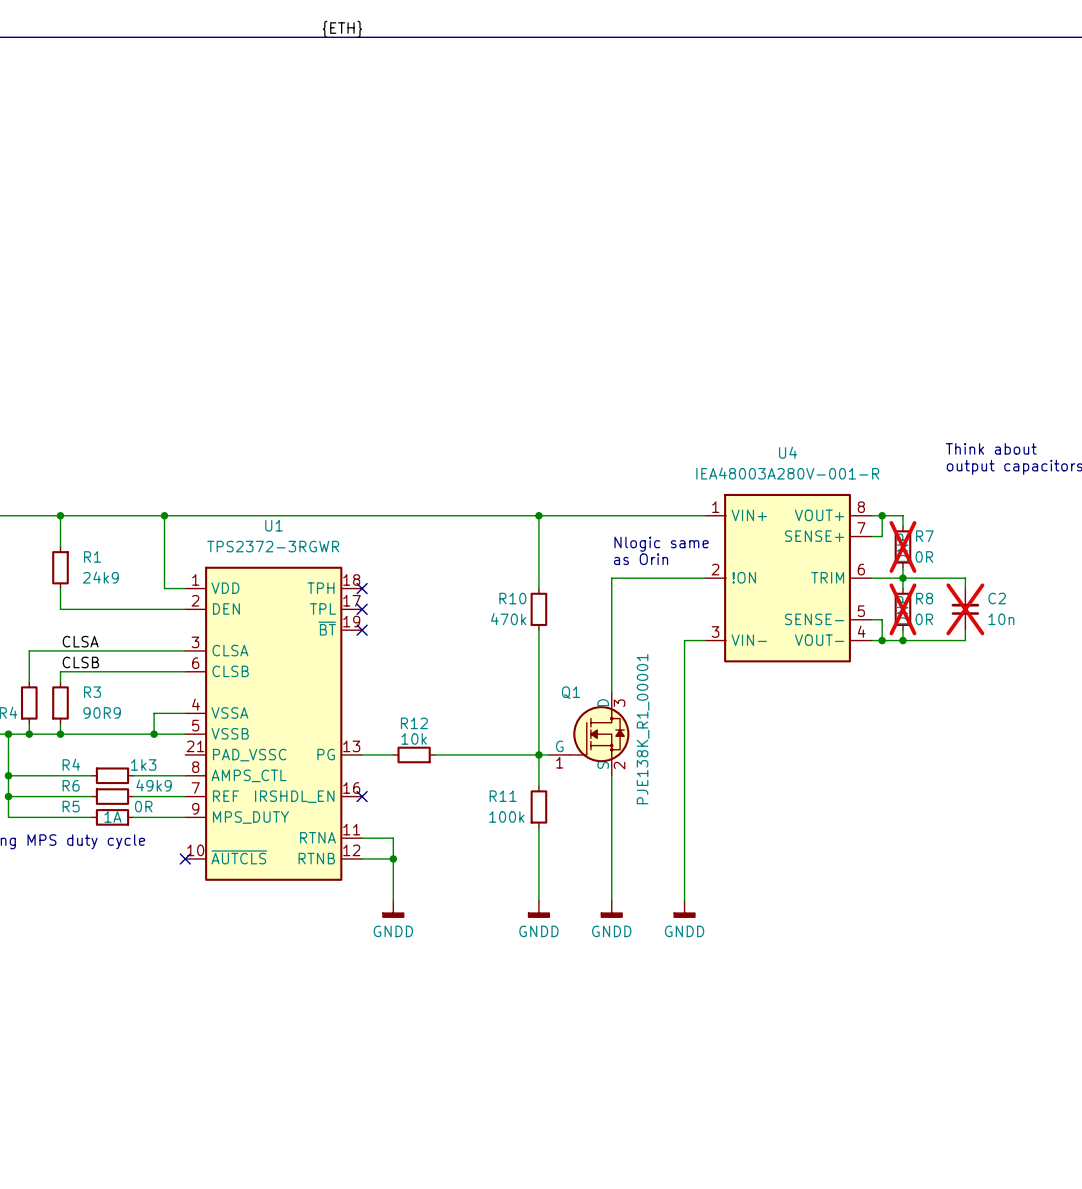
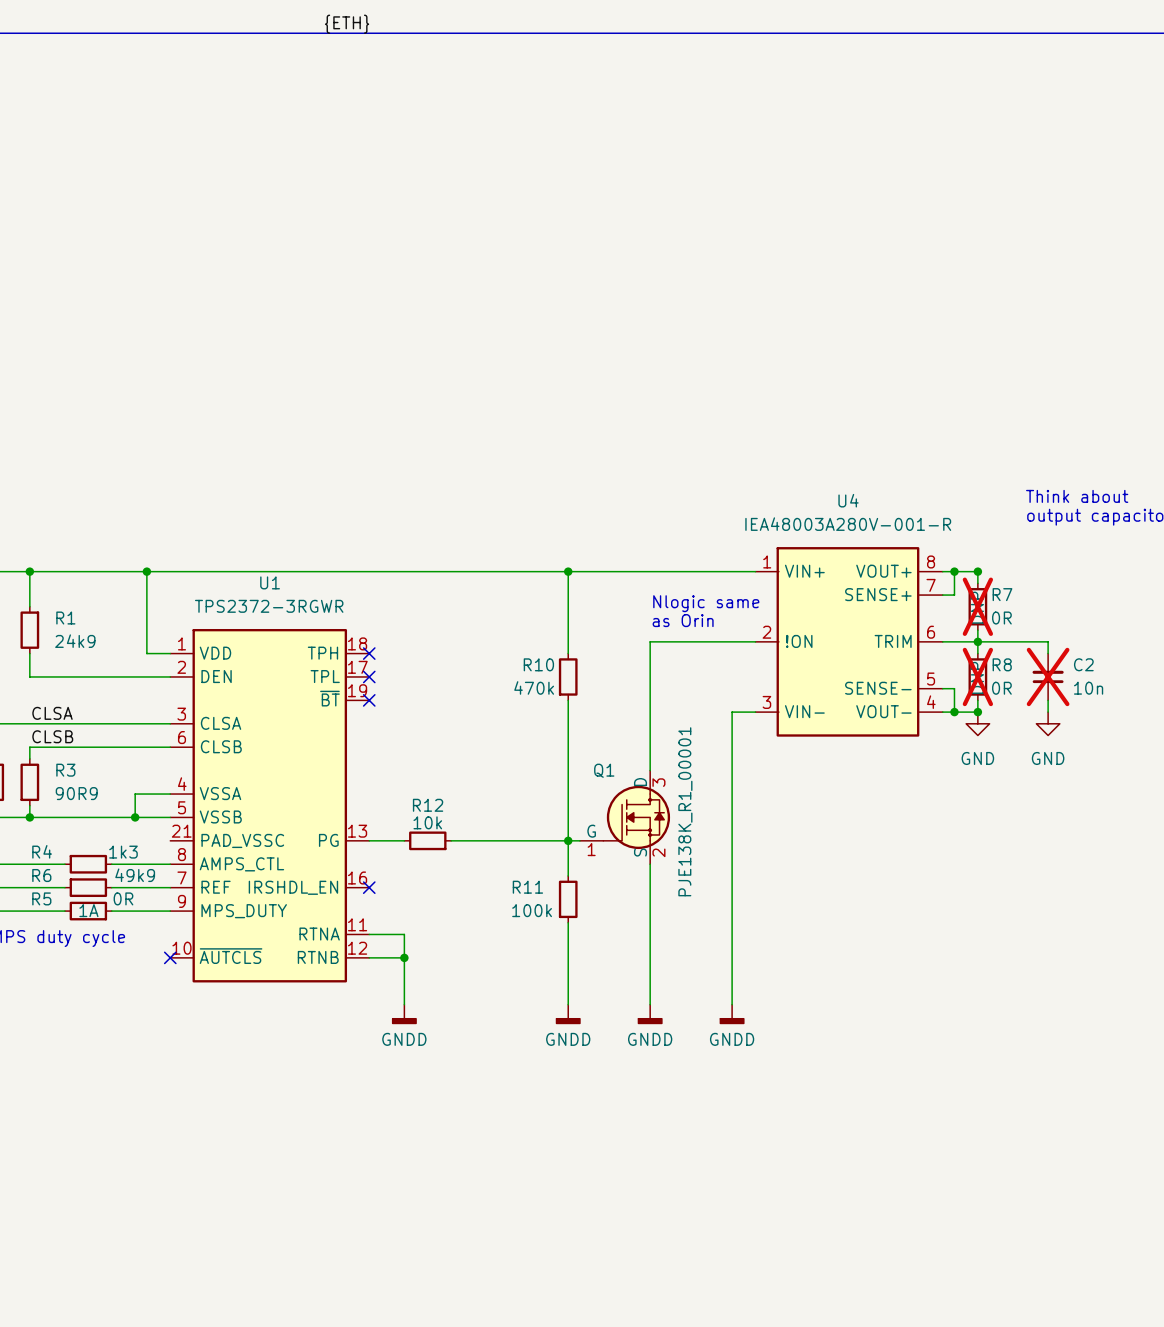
junction: none -> (977, 571)
wire: (902, 640) (965, 640) -> none
power symbol: none -> GND (977, 723)
power symbol: none -> GND (1048, 723)

